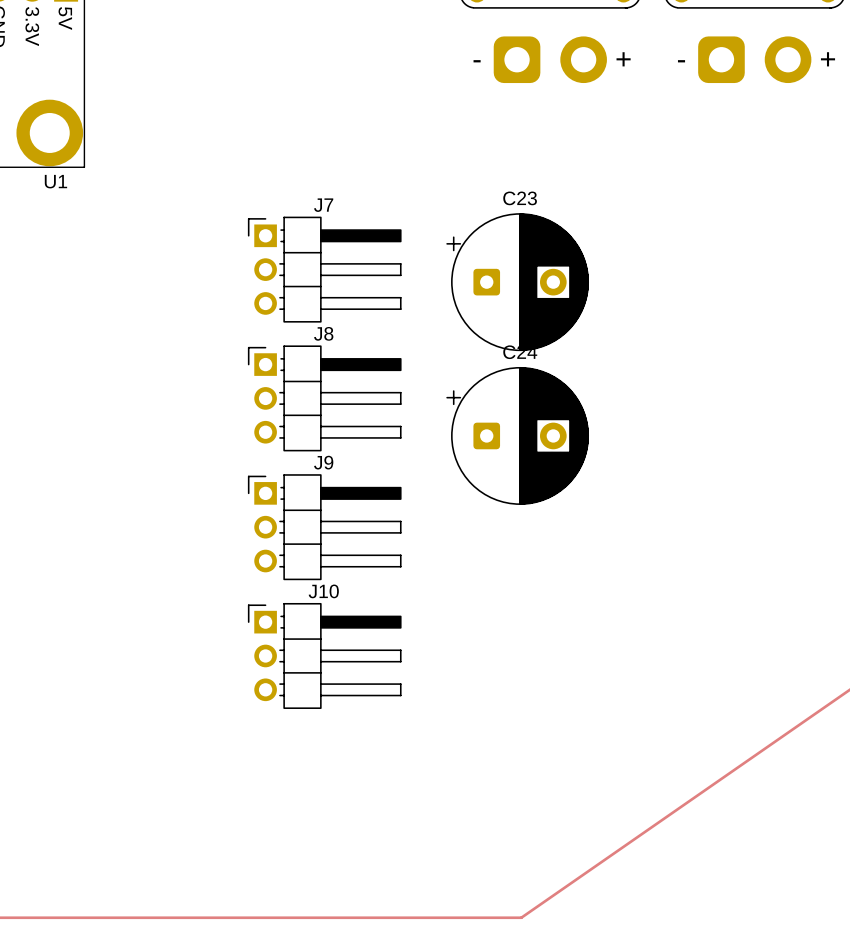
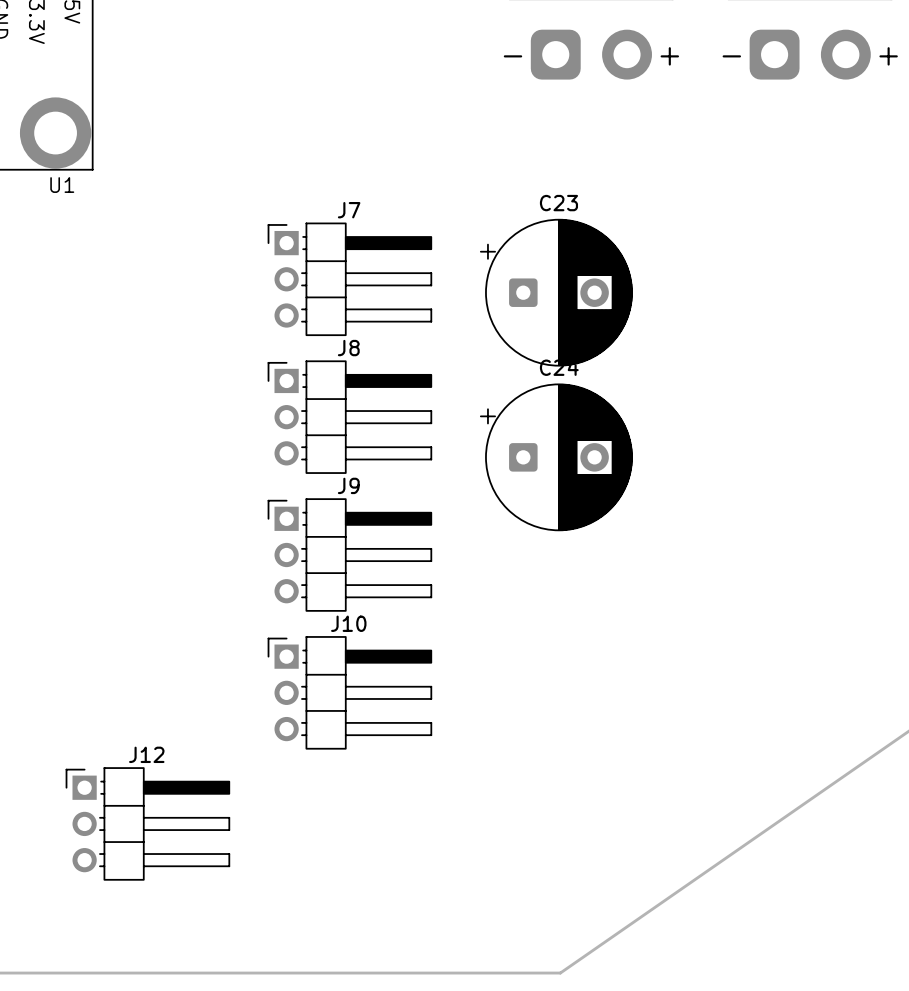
J12: none -> (147, 823)

